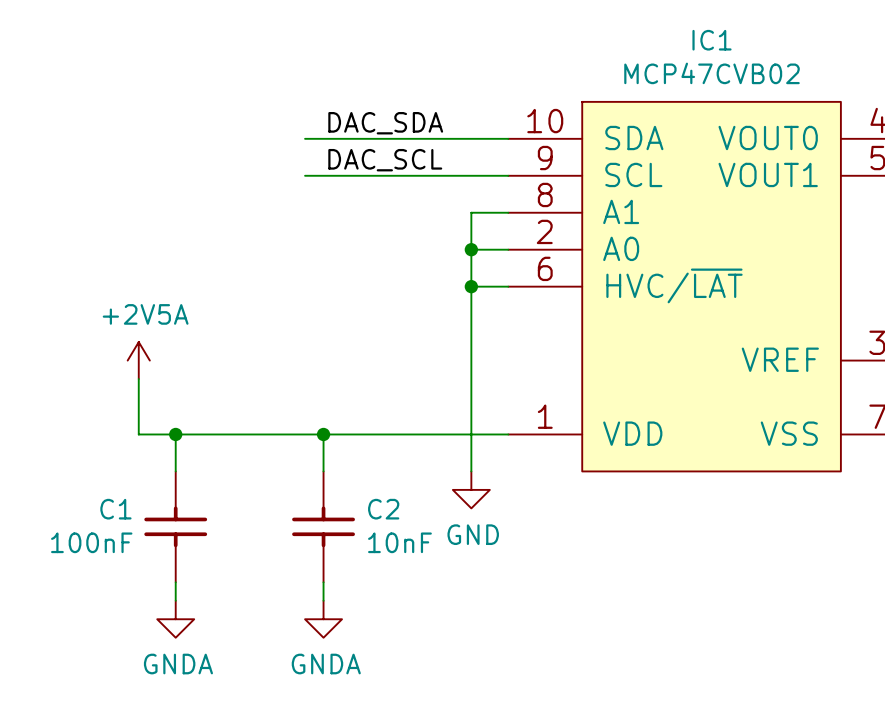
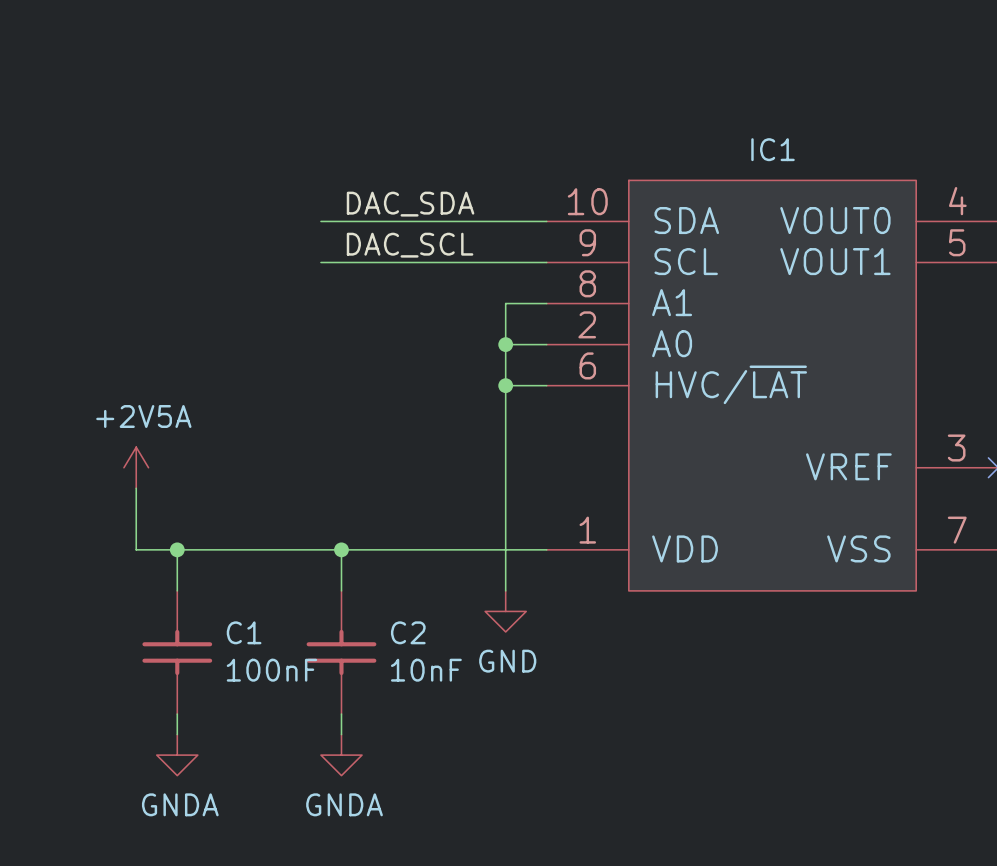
IC1 name position: IC1 (712, 40) -> IC1 (773, 149)
IC1 value: MCP47CVB02 (712, 73) -> none
C1 name position: C1 (115, 509) -> C1 (244, 632)
C1 text position: 100nF (91, 542) -> 100nF (271, 670)

